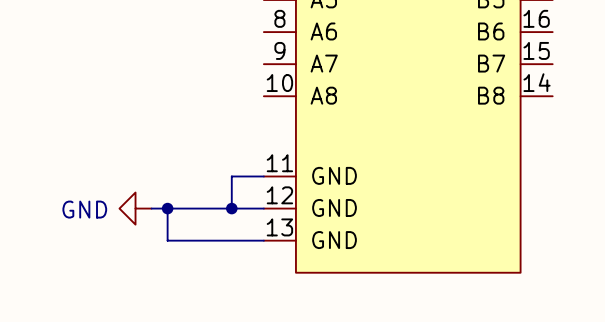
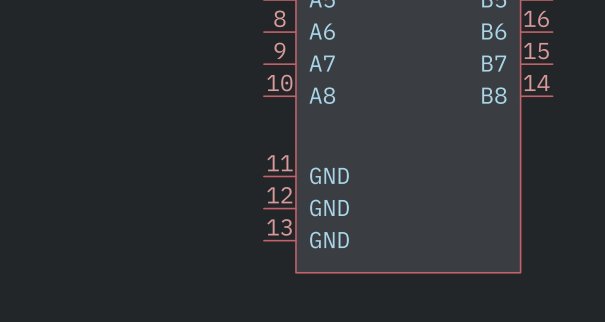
wire: (263, 176) (231, 176) (231, 208) -> none
power symbol: GND (135, 208) -> none
wire: (151, 208) (263, 208) -> none
wire: (167, 208) (167, 240) (263, 240) -> none
junction: (167, 208) -> none
junction: (231, 208) -> none

